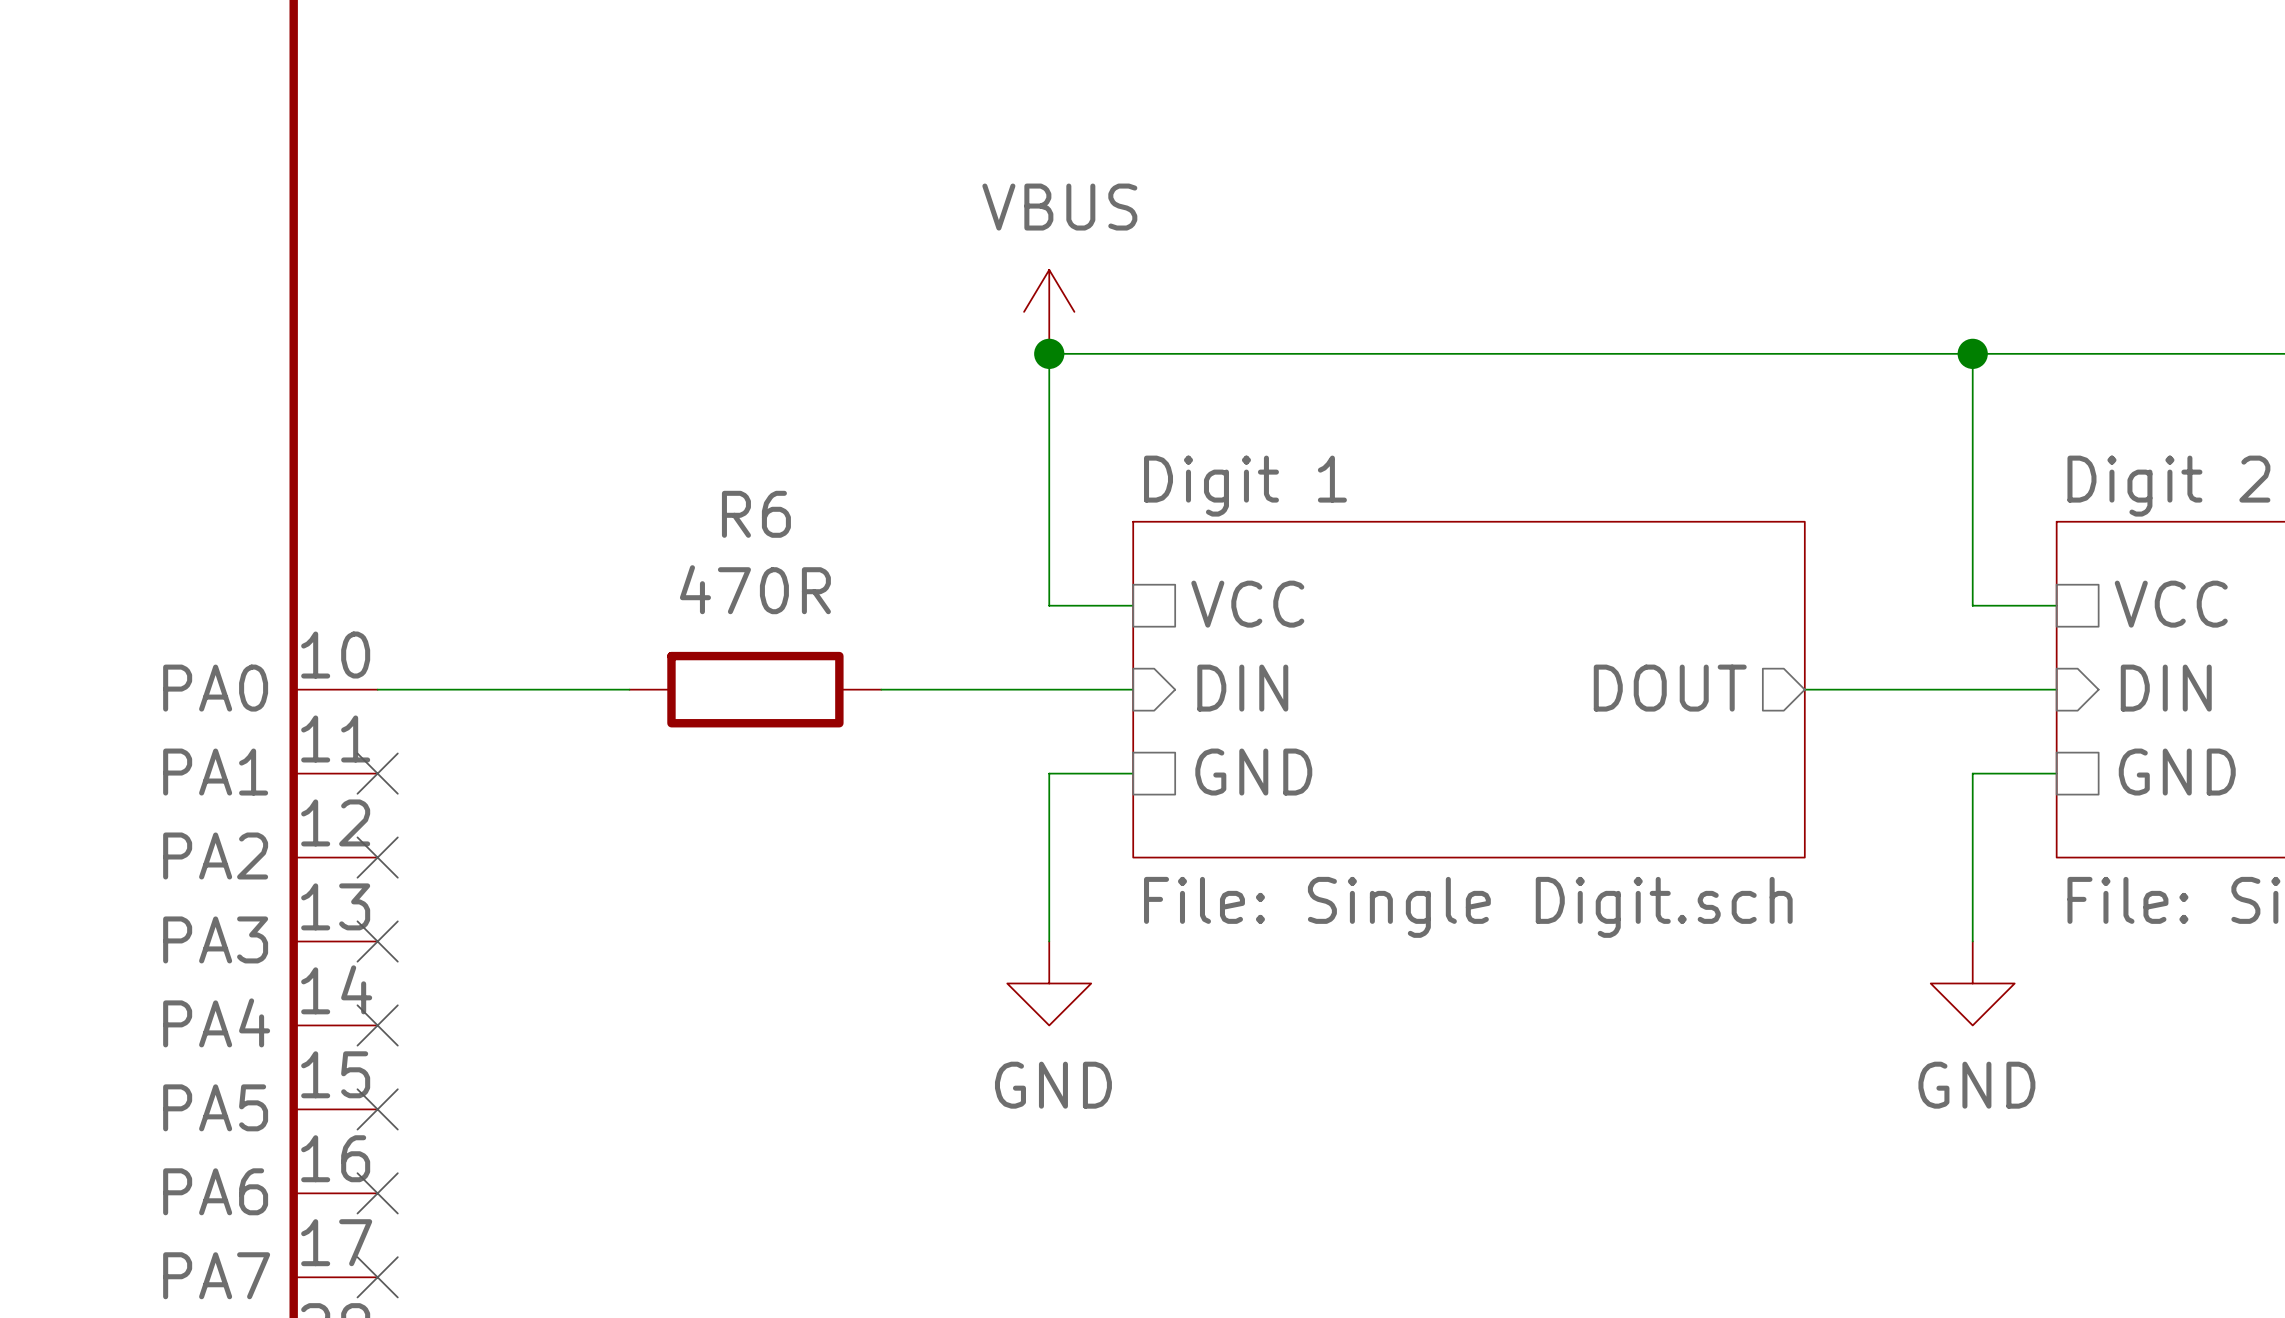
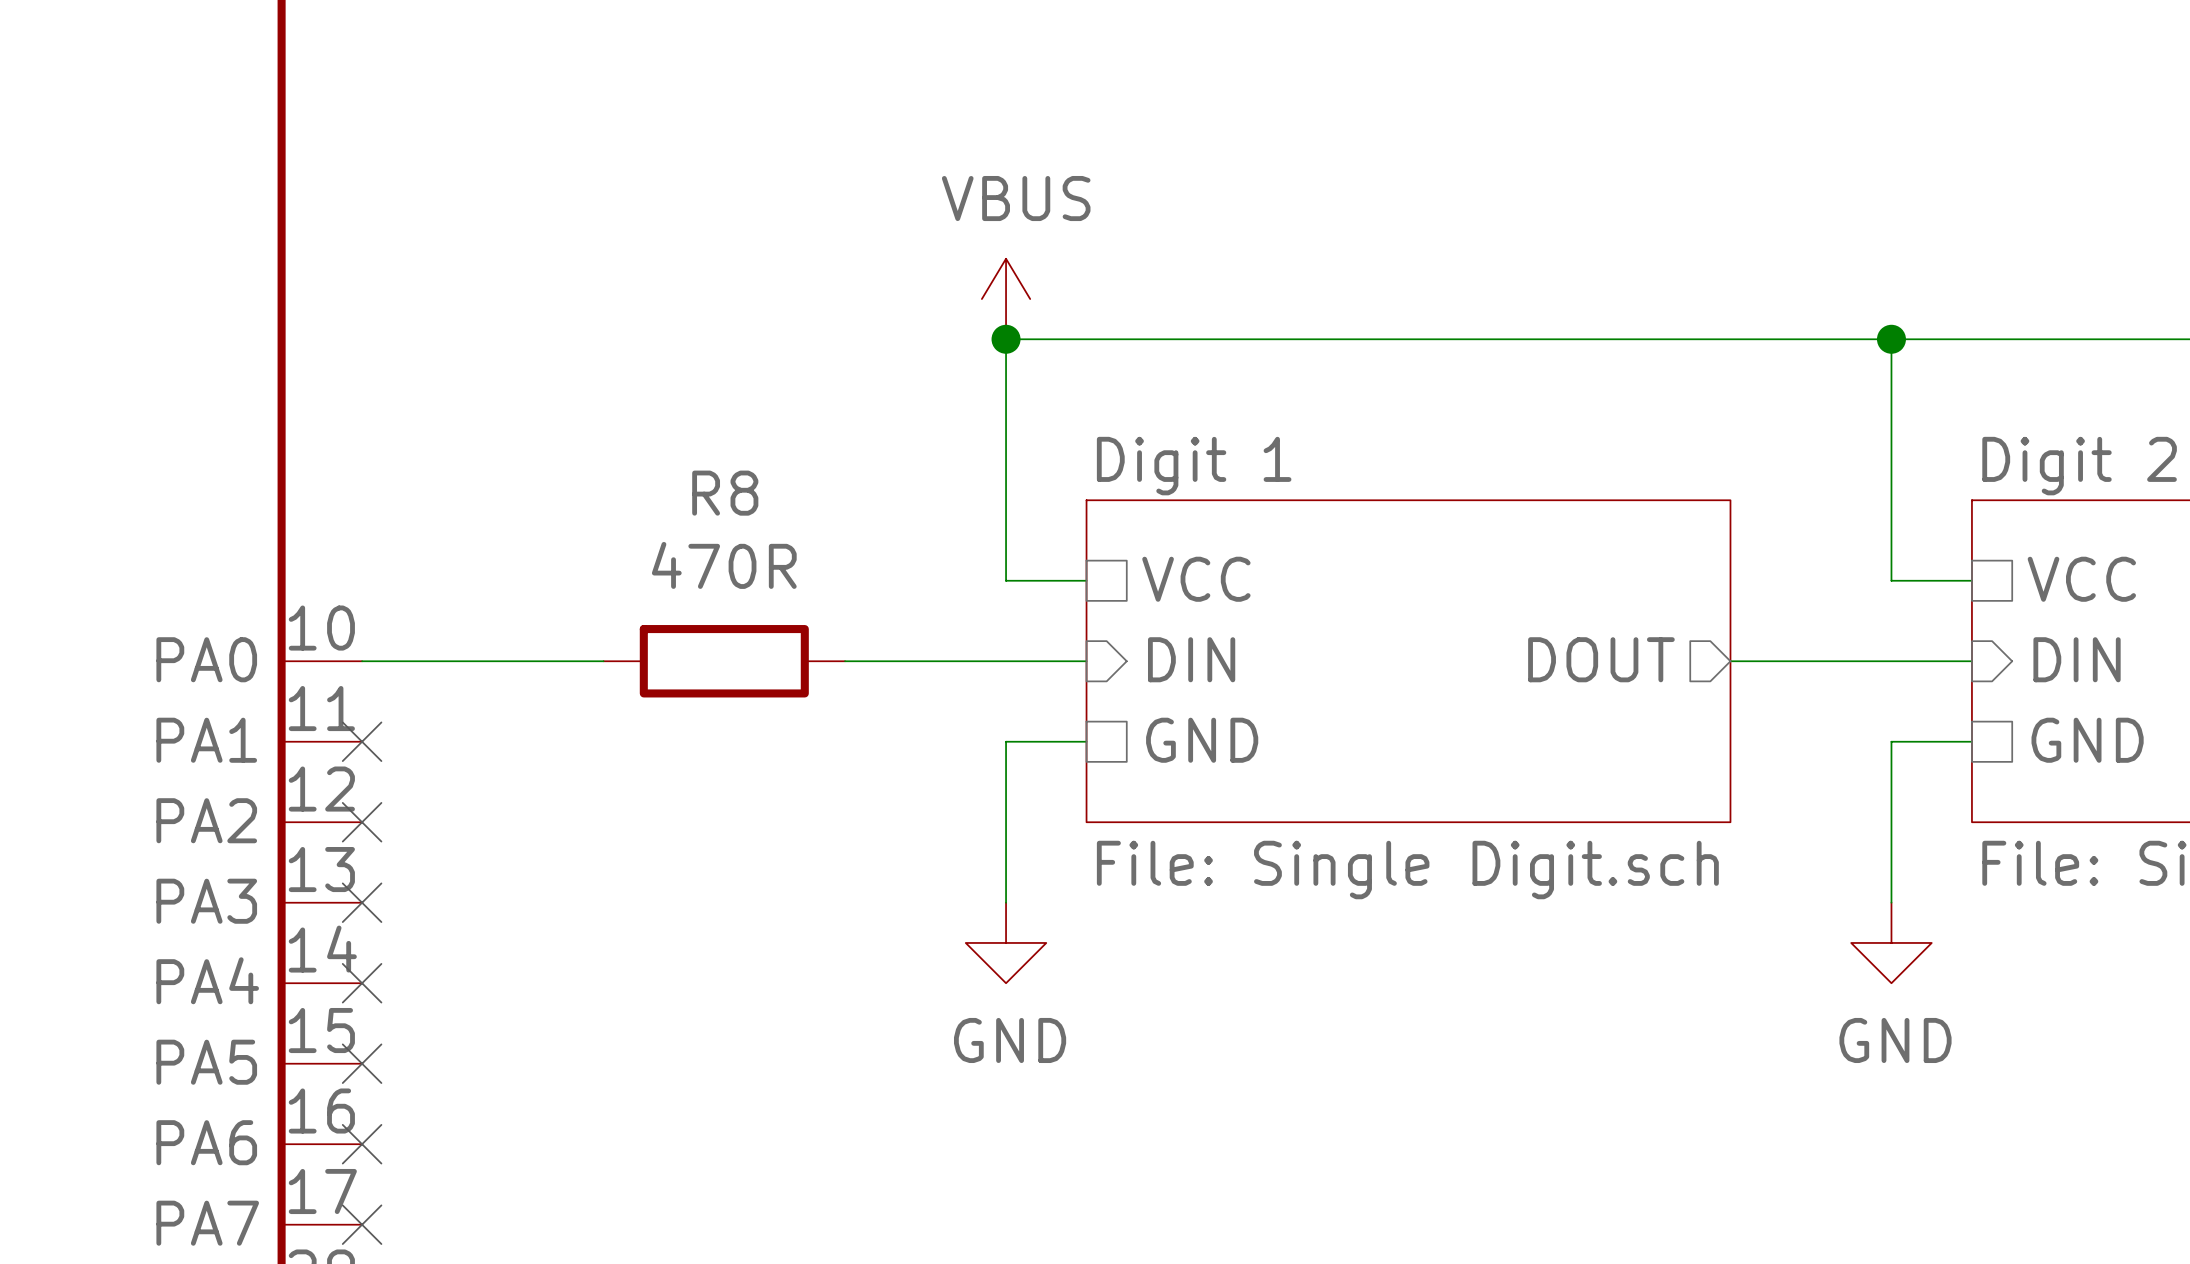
R6 name: R6 (756, 514) -> R8 (725, 493)

